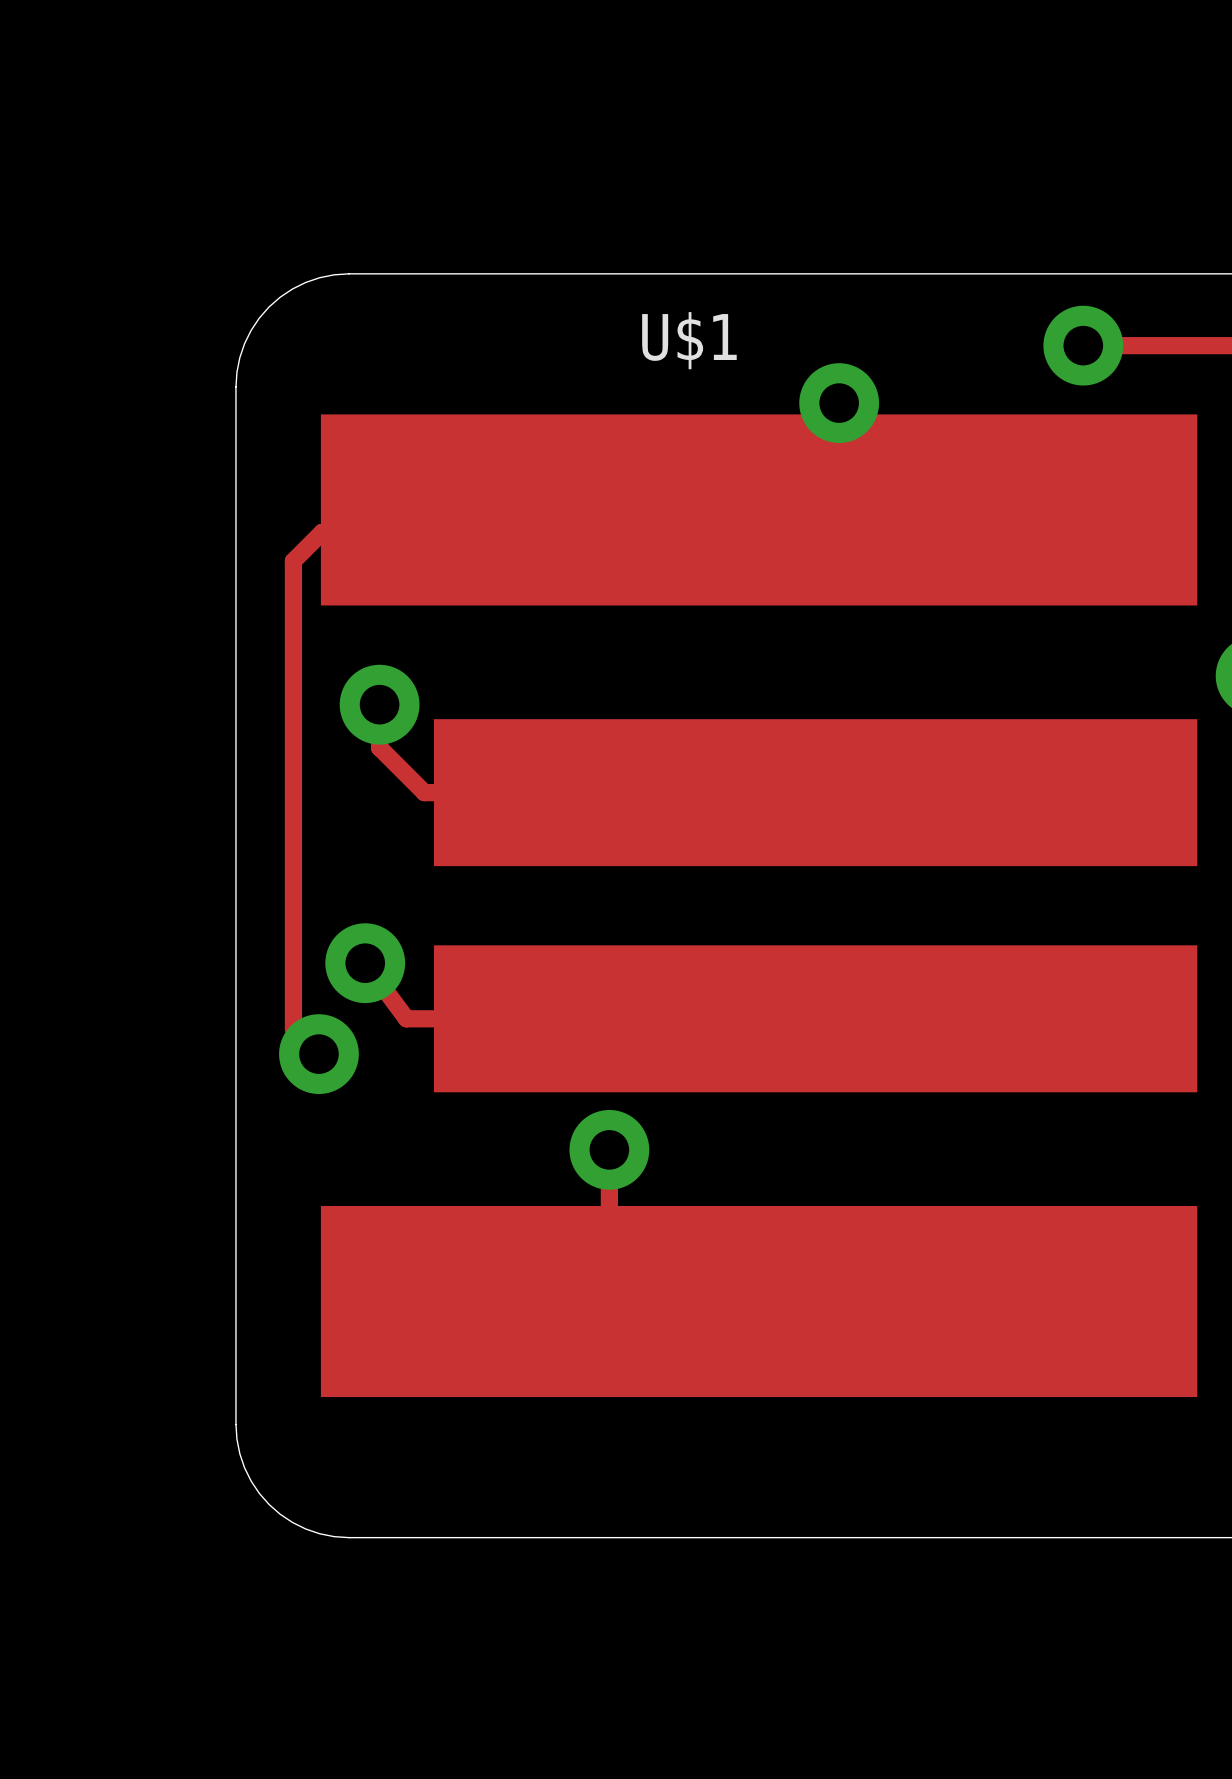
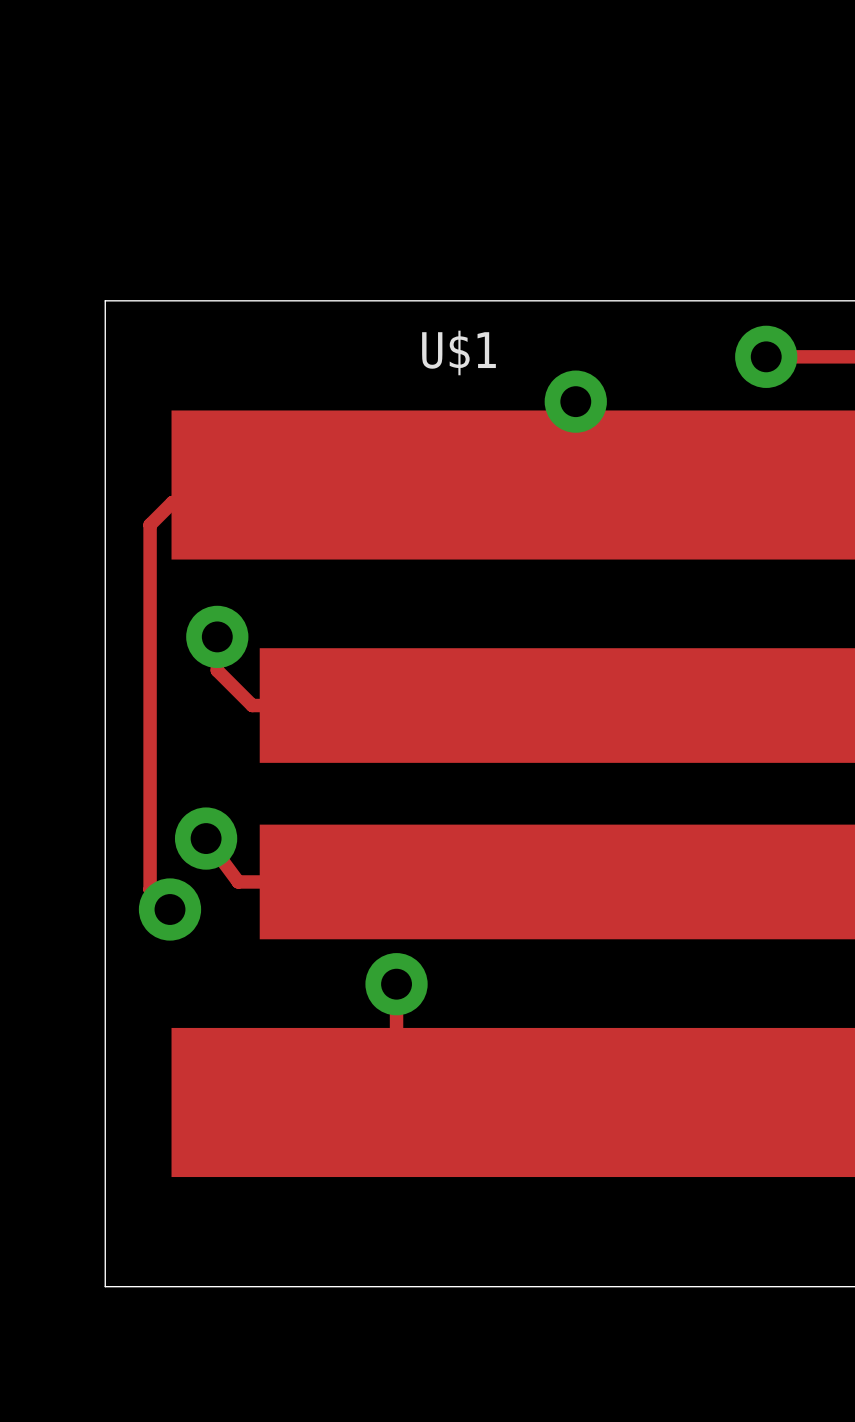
board edge: (349, 273) (319, 277) (305, 282) (280, 297) (269, 306) (259, 318) (244, 343) (239, 357) (235, 386) -> (193, 300) (105, 300) (105, 389)
board edge: (235, 1424) (239, 1453) (244, 1467) (259, 1493) (269, 1504) (280, 1514) (305, 1529) (319, 1533) (349, 1537) -> (105, 1198) (105, 1286) (193, 1286)

